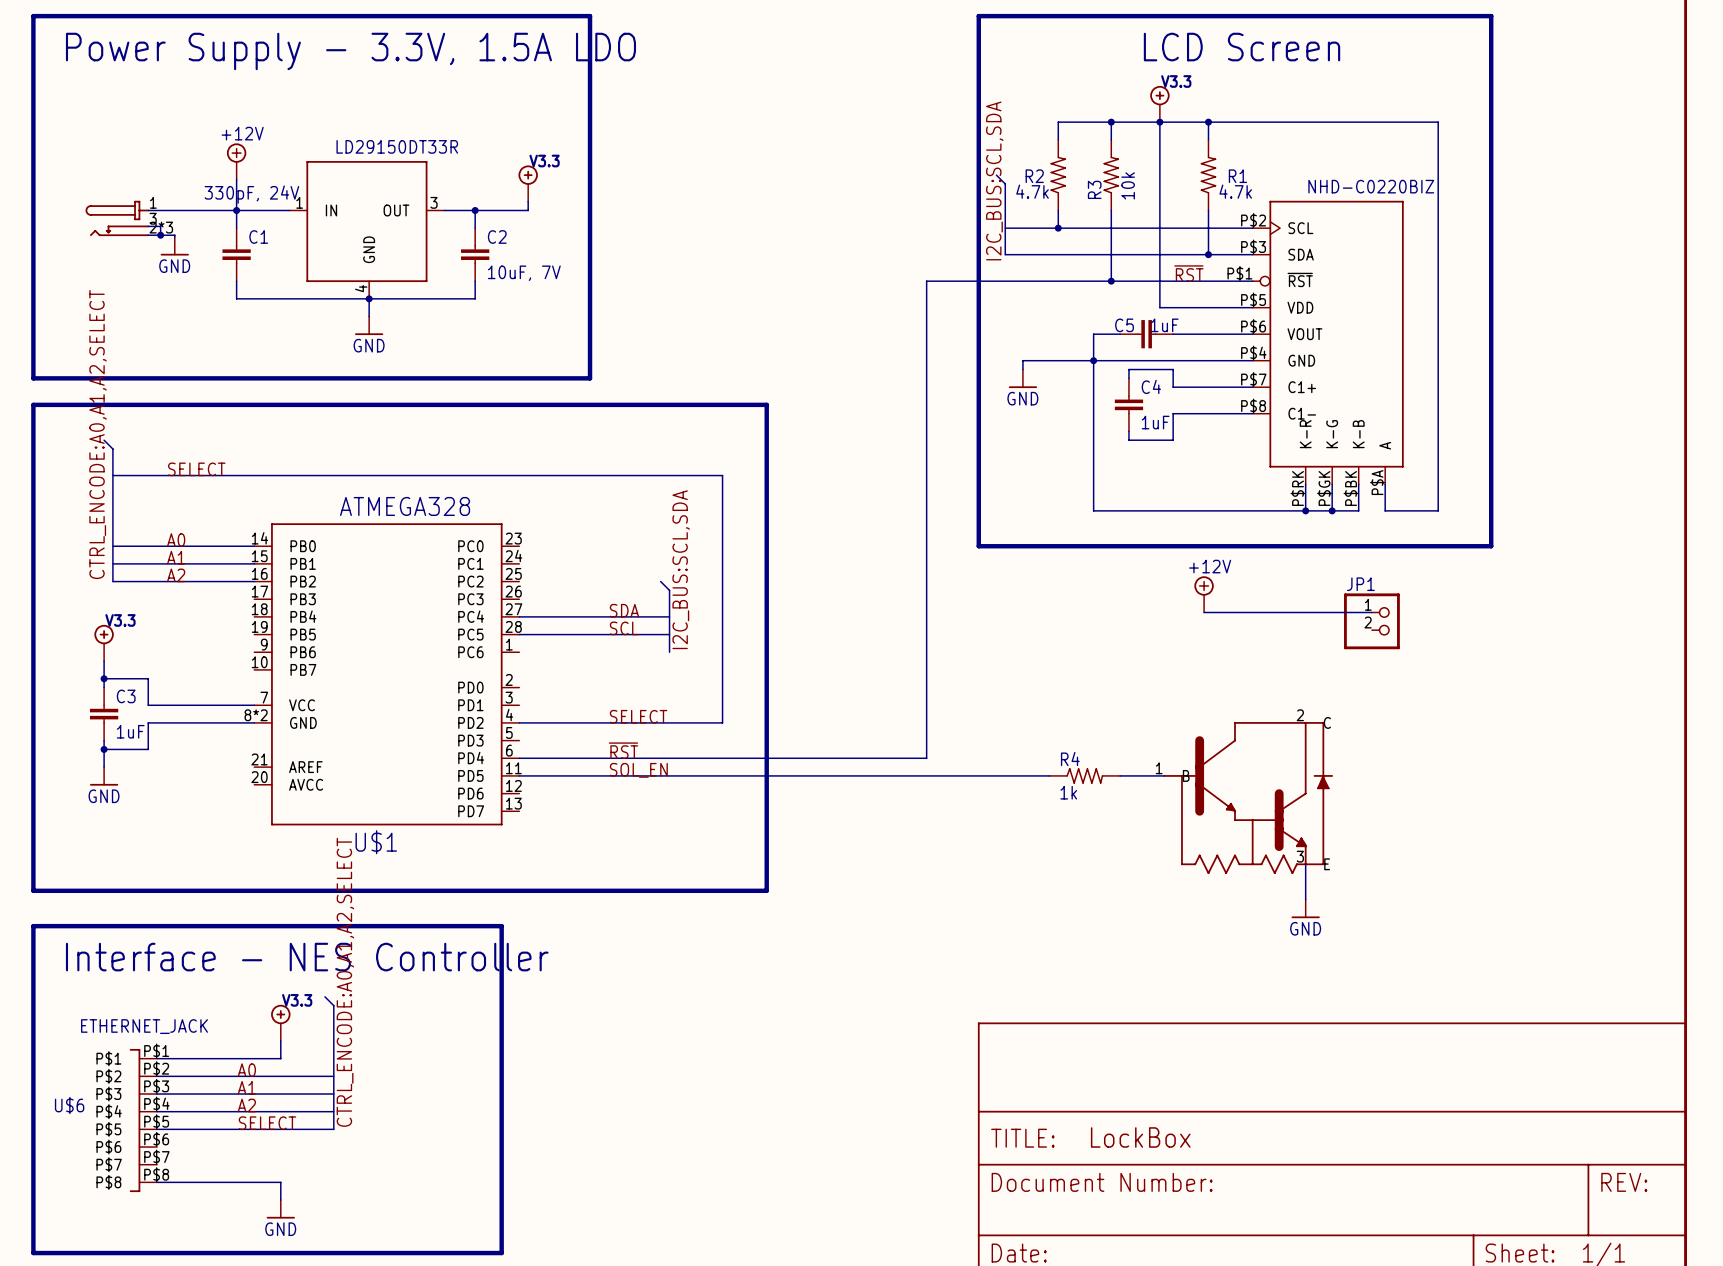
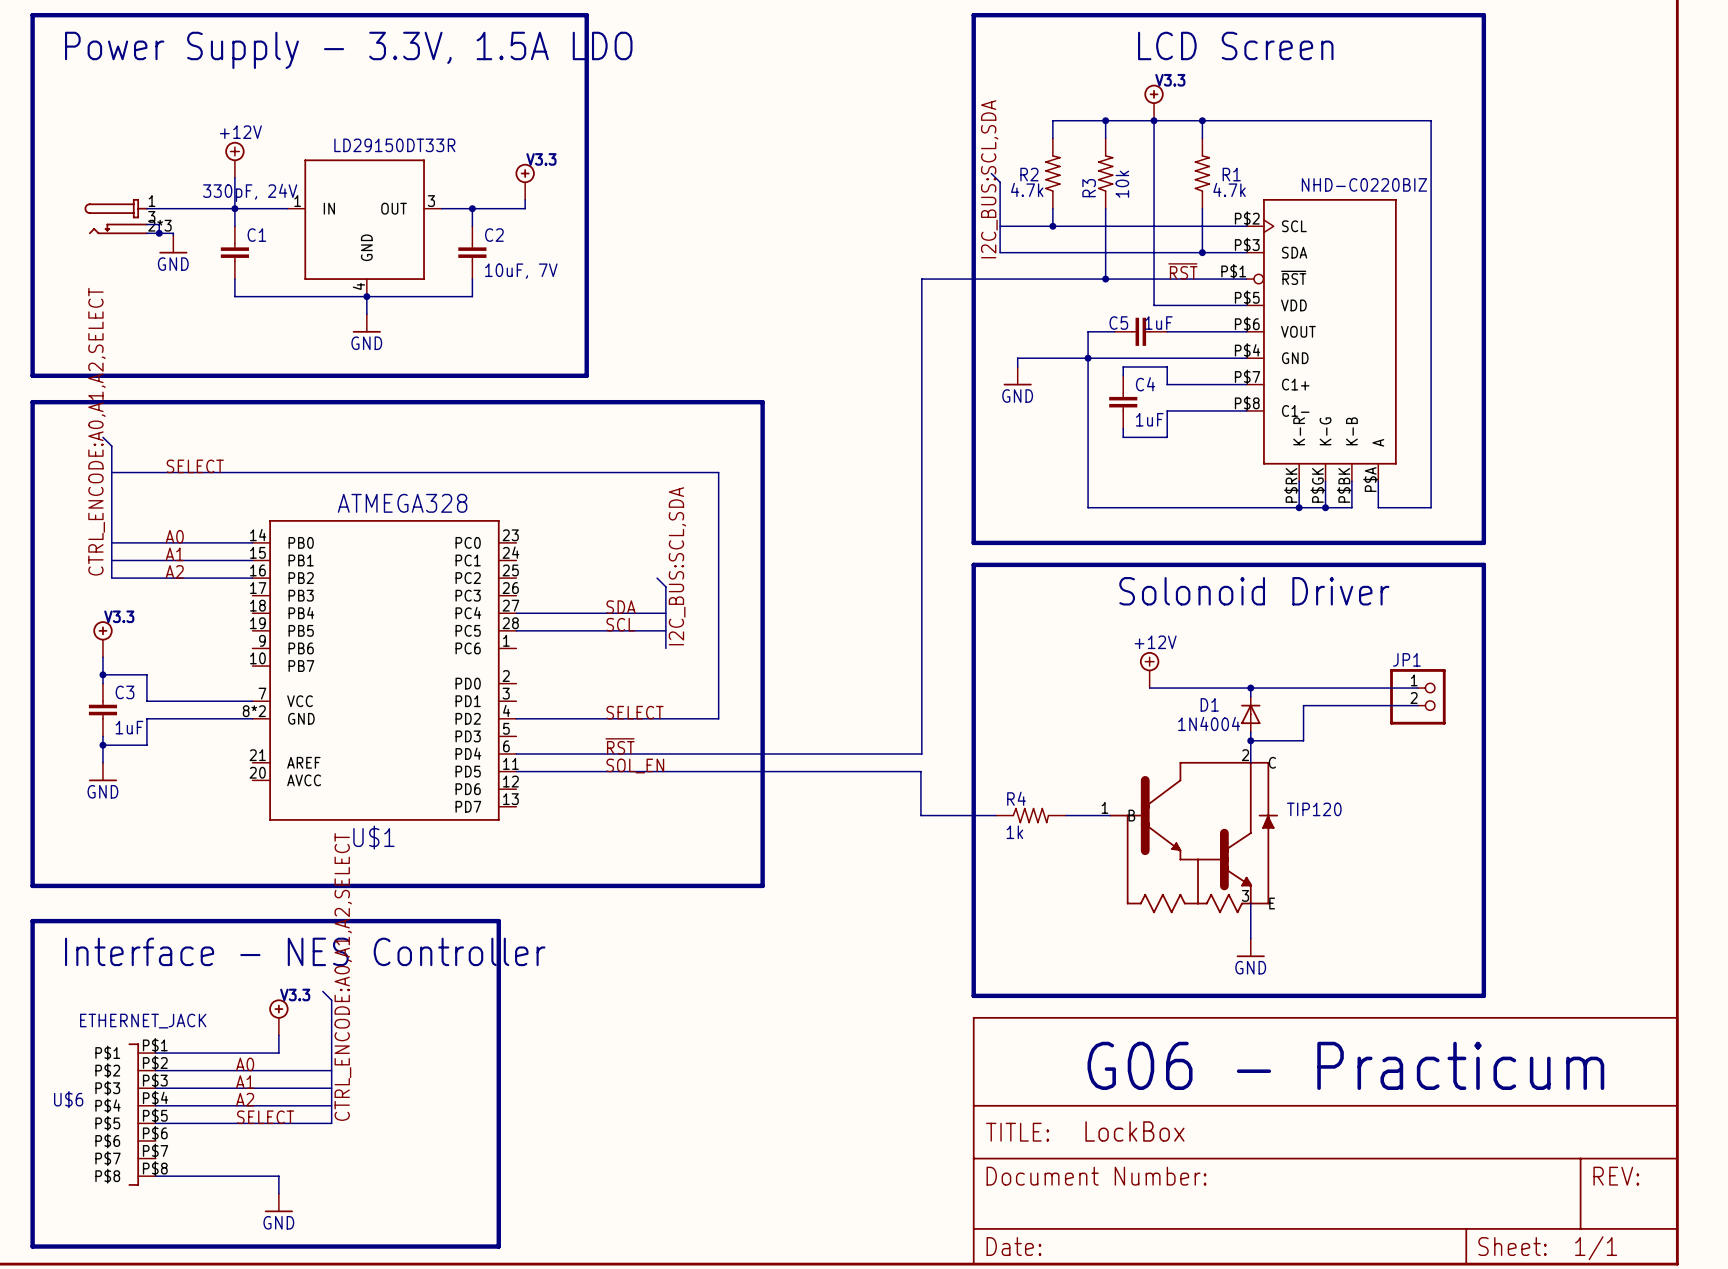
line: none -> (973, 564) (1483, 564) (1483, 995) (973, 995) (973, 564)
power symbol position: +12V (1204, 594) -> +12V (1149, 670)
text: none -> Solonoid Driver (1254, 591)
wire: (1204, 612) (1371, 612) -> none
JP1 position: (1371, 621) -> (1417, 696)
wire: none -> (1149, 688) (1417, 688)
wire: none -> (1250, 688) (1250, 696)
junction: none -> (1250, 688)
wire: none -> (1417, 705) (1303, 705) (1303, 740) (1250, 740)
D1: none -> 1N4004 (1250, 714)
wire: none -> (1250, 732) (1250, 762)
junction: none -> (1250, 740)
wire: (925, 775) (1049, 775) -> (920, 771) (920, 815) (995, 815)
R4 position: (1084, 775) -> (1030, 815)
wire: (1120, 775) (1164, 775) -> (1066, 815) (1110, 815)
part: (1248, 798) -> none
part: none -> TIP120 (1193, 837)
wire: (1305, 864) (1305, 899) -> (1250, 903) (1250, 938)
power symbol position: GND (1305, 908) -> GND (1250, 947)
text: none -> G06 - Practicum (1345, 1065)

